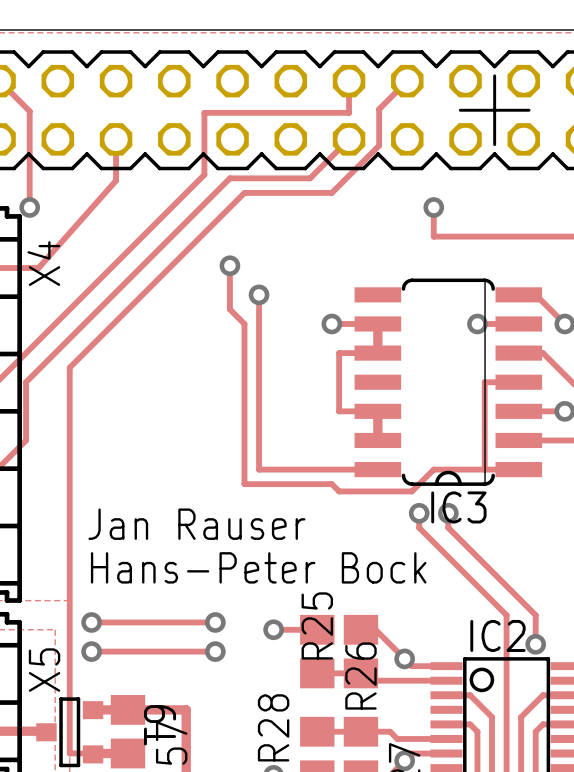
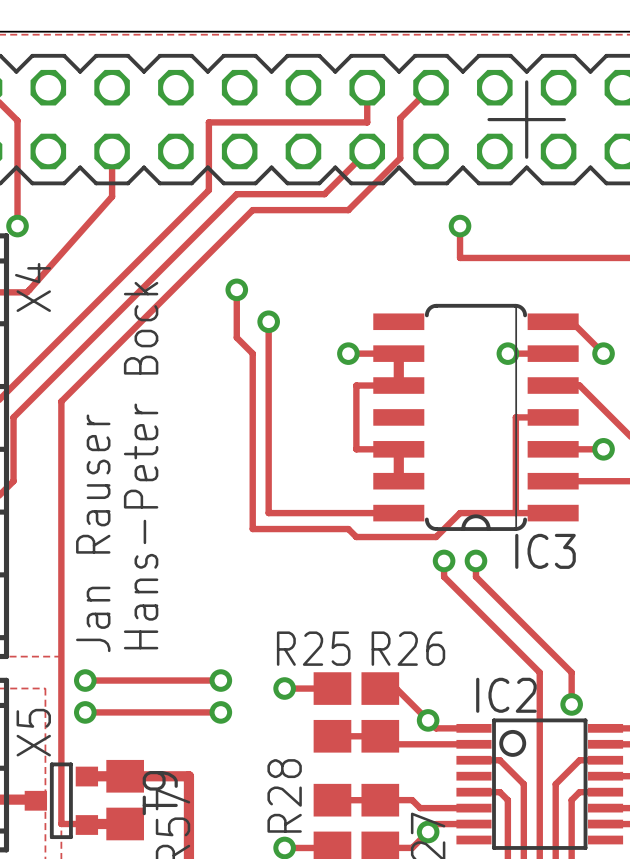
IC3 name position: IC3 (458, 507) -> IC3 (545, 551)
text rotation: 0° (196, 524) -> 90° counterclockwise (93, 533)
text rotation: 0° (258, 567) -> 90° counterclockwise (141, 465)
R25 name rotation: 0° (317, 625) -> 90° clockwise (313, 648)
IC2 name position: IC2 (497, 635) -> IC2 (506, 695)
R26 name rotation: 0° (360, 676) -> 90° clockwise (408, 648)
R26 name position: R26 (360, 676) -> R26 (408, 648)

